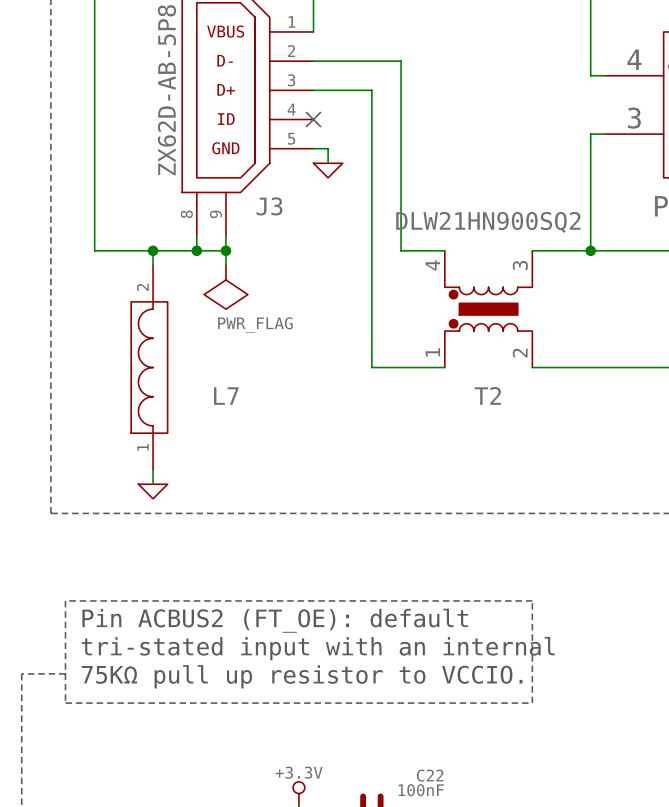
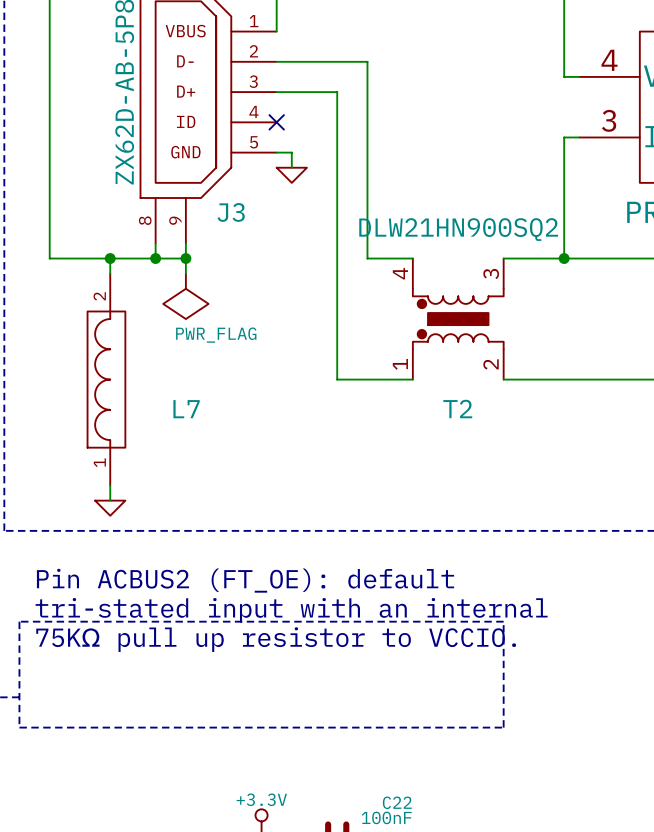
text position: Pin ACBUS2 (FT_OE): default (275, 620) -> Pin ACBUS2 (FT_OE): default (245, 580)
text position: tri-stated input with an internal (318, 648) -> tri-stated input with an internal (291, 610)
text position: 75KΩ pull up resistor to VCCIO. (302, 676) -> 75KΩ pull up resistor to VCCIO. (276, 639)

